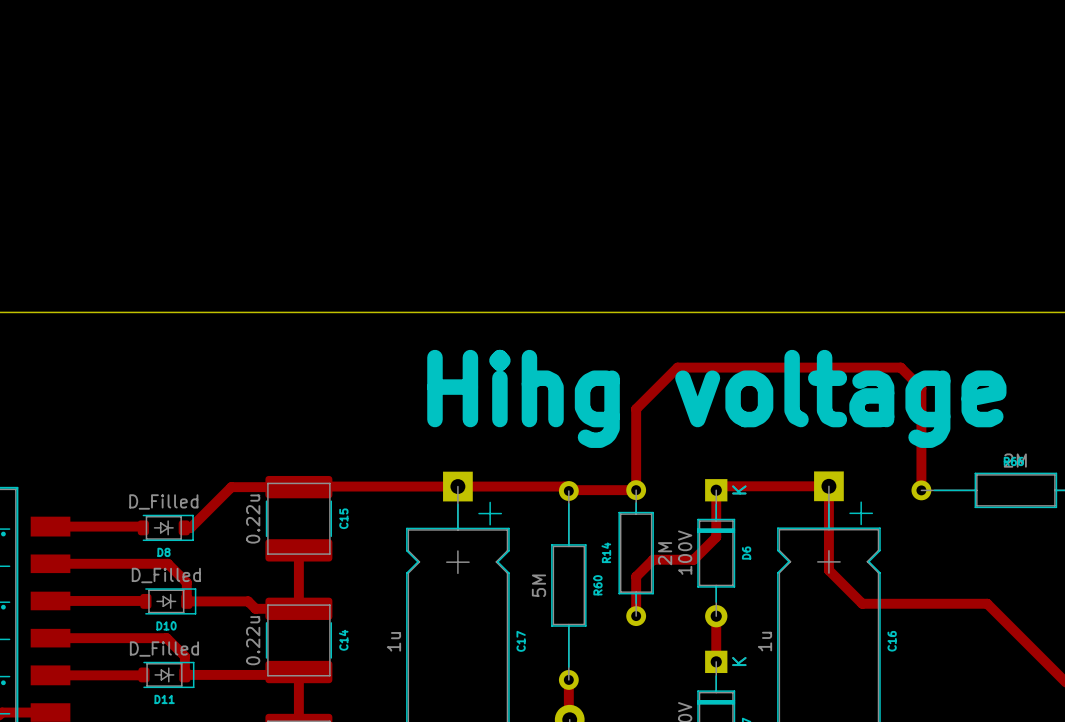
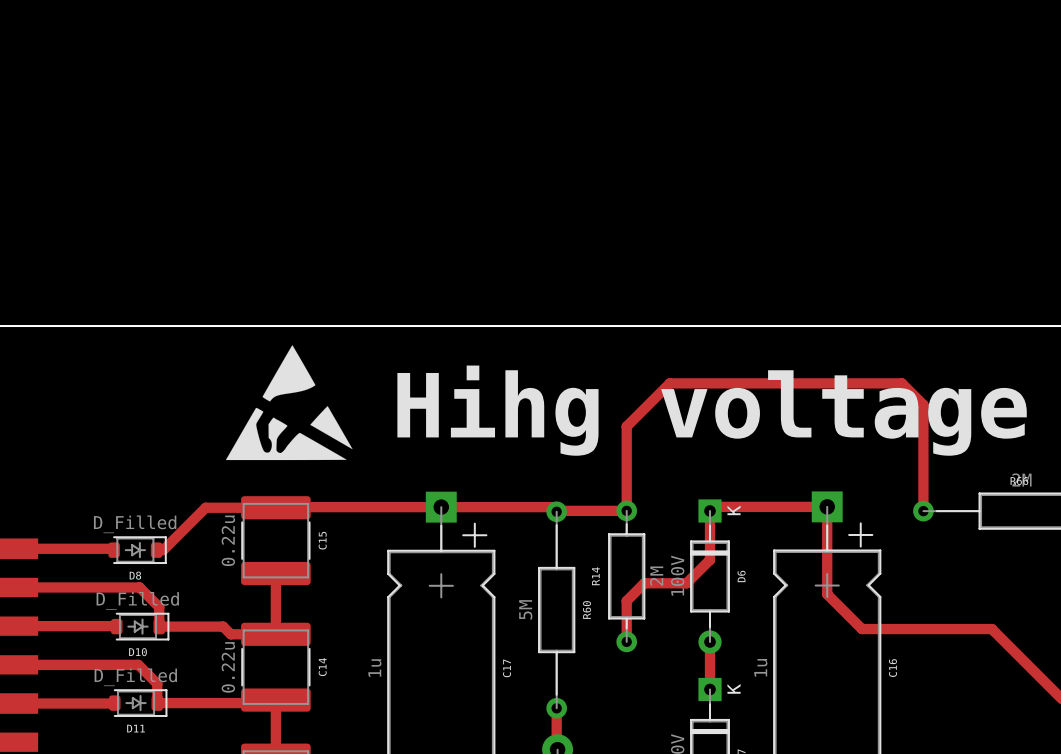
drawing: none -> [225, 345, 353, 461]

